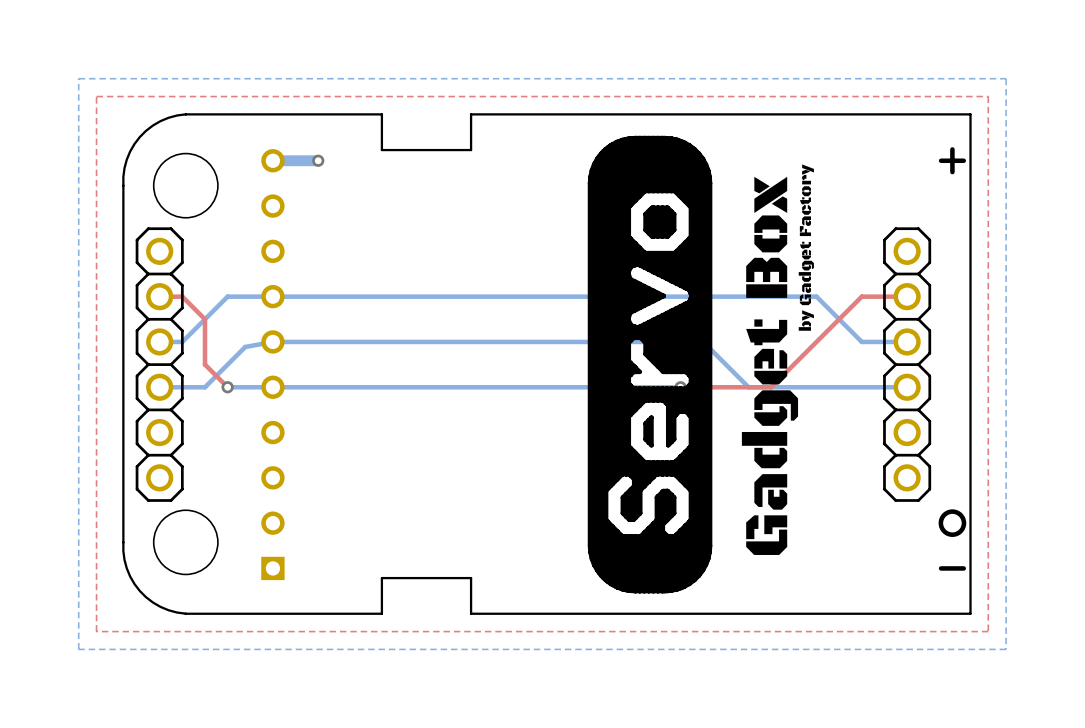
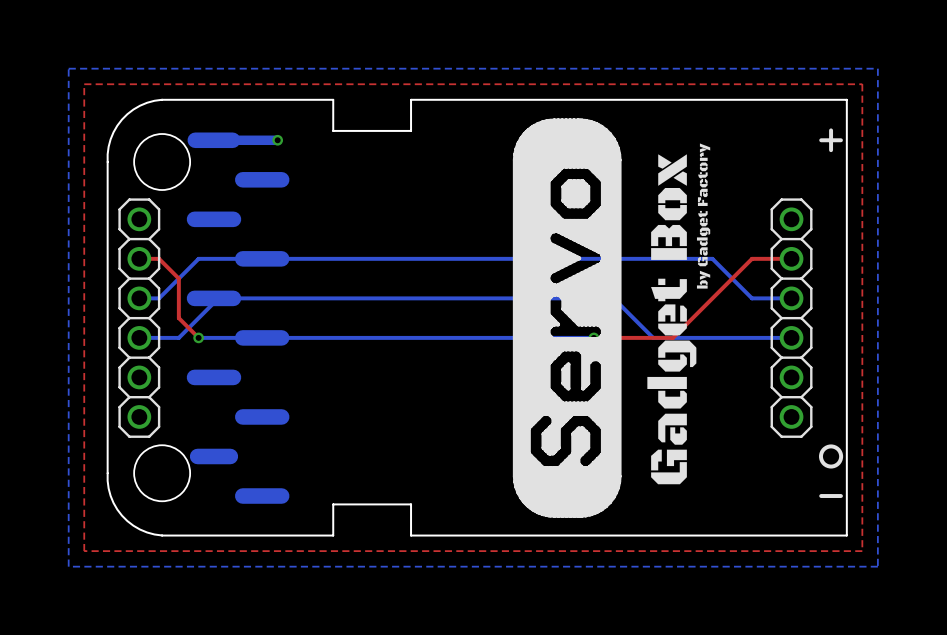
part footprint: [122, 113, 972, 615] -> [106, 98, 848, 537]

